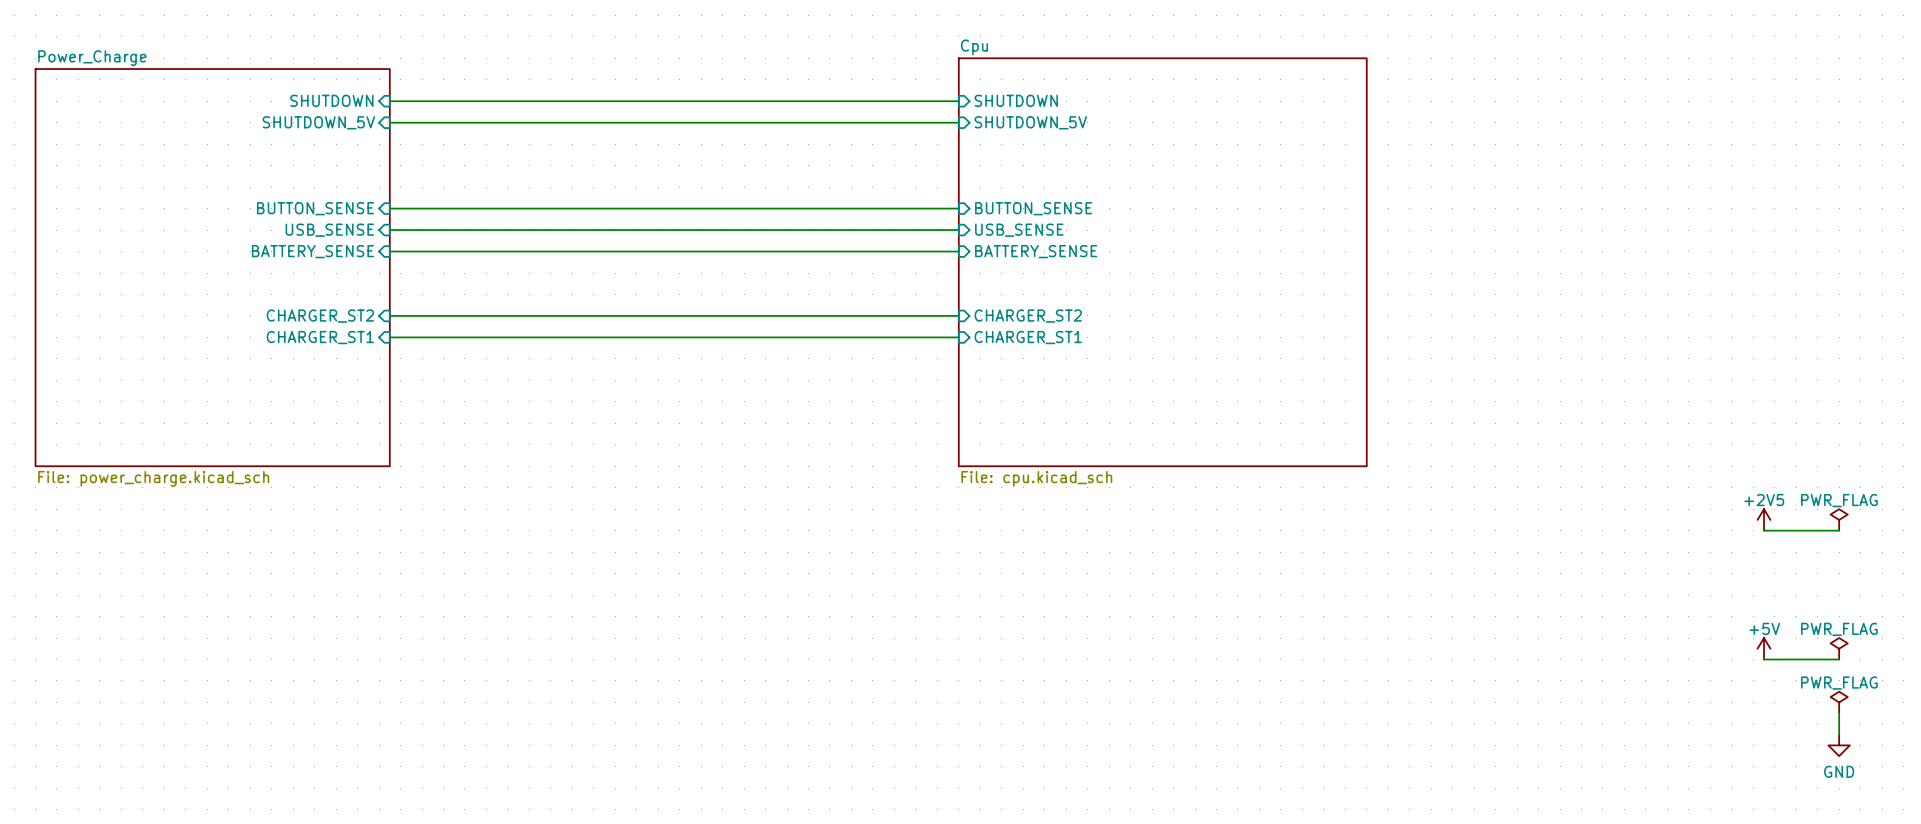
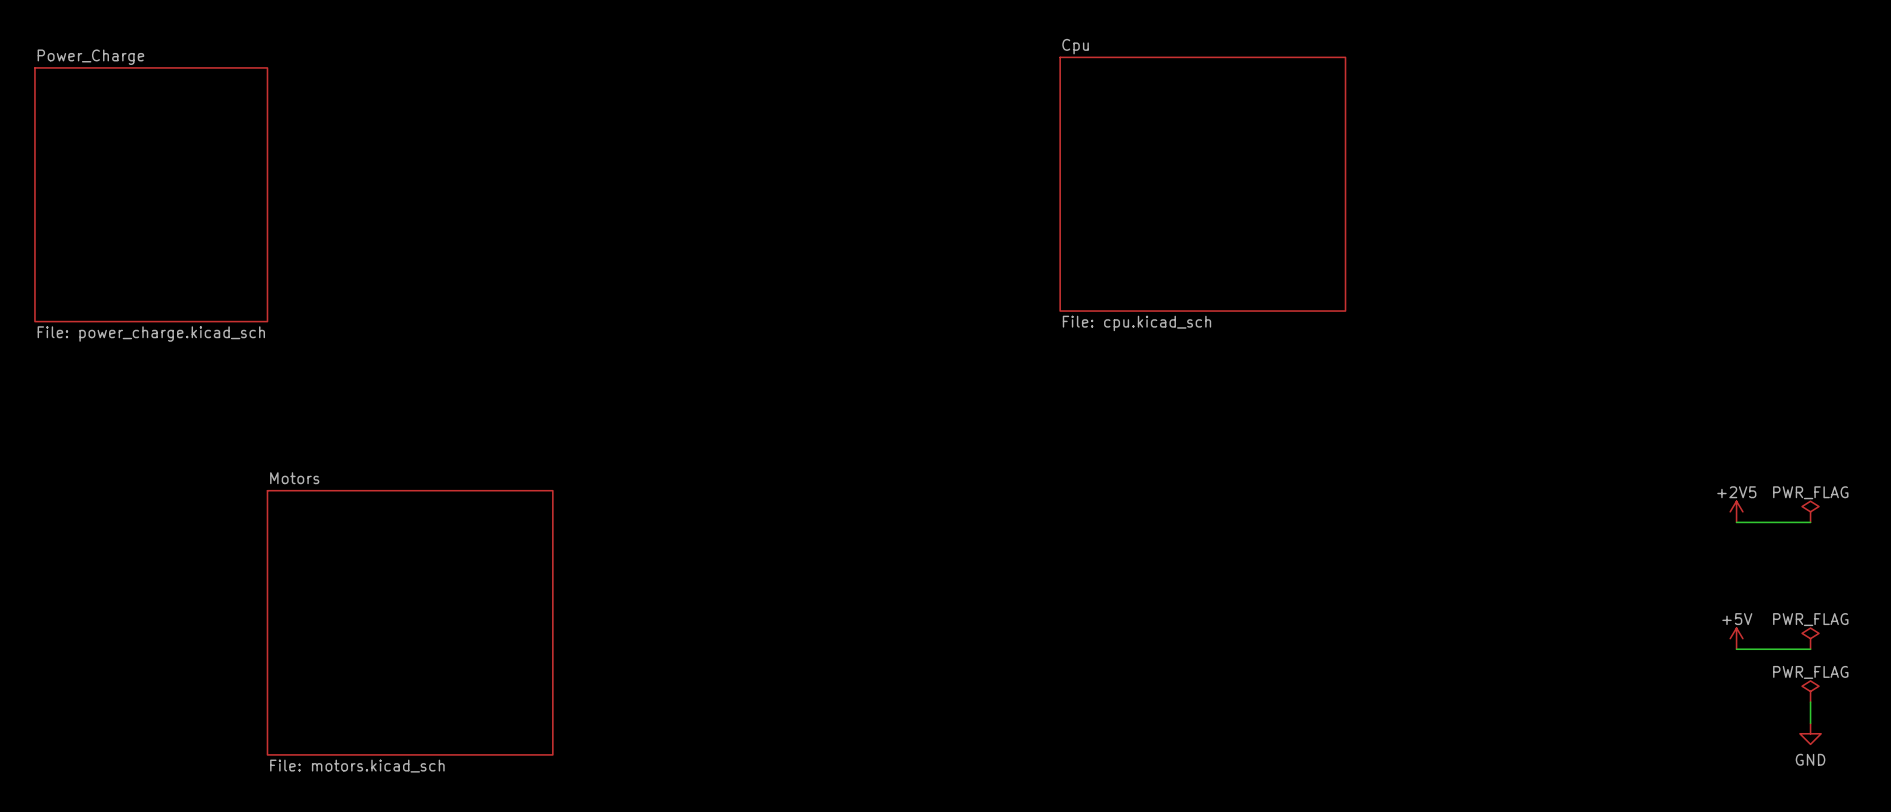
sheet pin: SHUTDOWN (331, 100) -> none
sheet pin: SHUTDOWN (1016, 100) -> none
wire: (389, 101) (958, 101) -> none
sheet pin: SHUTDOWN_5V (318, 122) -> none
wire: (389, 122) (958, 122) -> none
sheet pin: SHUTDOWN_5V (1030, 122) -> none
sheet Cpu: none -> File: cpu.kicad_sch (1202, 184)
sheet Power_Charge: none -> File: power_charge.kicad_sch (151, 194)
sheet pin: BUTTON_SENSE (315, 208) -> none
wire: (389, 208) (958, 208) -> none
sheet pin: BUTTON_SENSE (1033, 208) -> none
sheet pin: USB_SENSE (329, 230) -> none
wire: (389, 230) (958, 230) -> none
sheet pin: USB_SENSE (1019, 230) -> none
sheet pin: BATTERY_SENSE (312, 251) -> none
wire: (389, 251) (958, 251) -> none
sheet pin: BATTERY_SENSE (1036, 251) -> none
sheet Cpu: File: cpu.kicad_sch (1162, 262) -> none
sheet Power_Charge: File: power_charge.kicad_sch (212, 267) -> none
wire: (389, 315) (958, 315) -> none
sheet pin: CHARGER_ST2 (320, 316) -> none
sheet pin: CHARGER_ST2 (1028, 316) -> none
sheet pin: CHARGER_ST1 (320, 337) -> none
wire: (389, 337) (958, 337) -> none
sheet pin: CHARGER_ST1 (1028, 337) -> none
sheet Motors: none -> File: motors.kicad_sch (410, 622)

